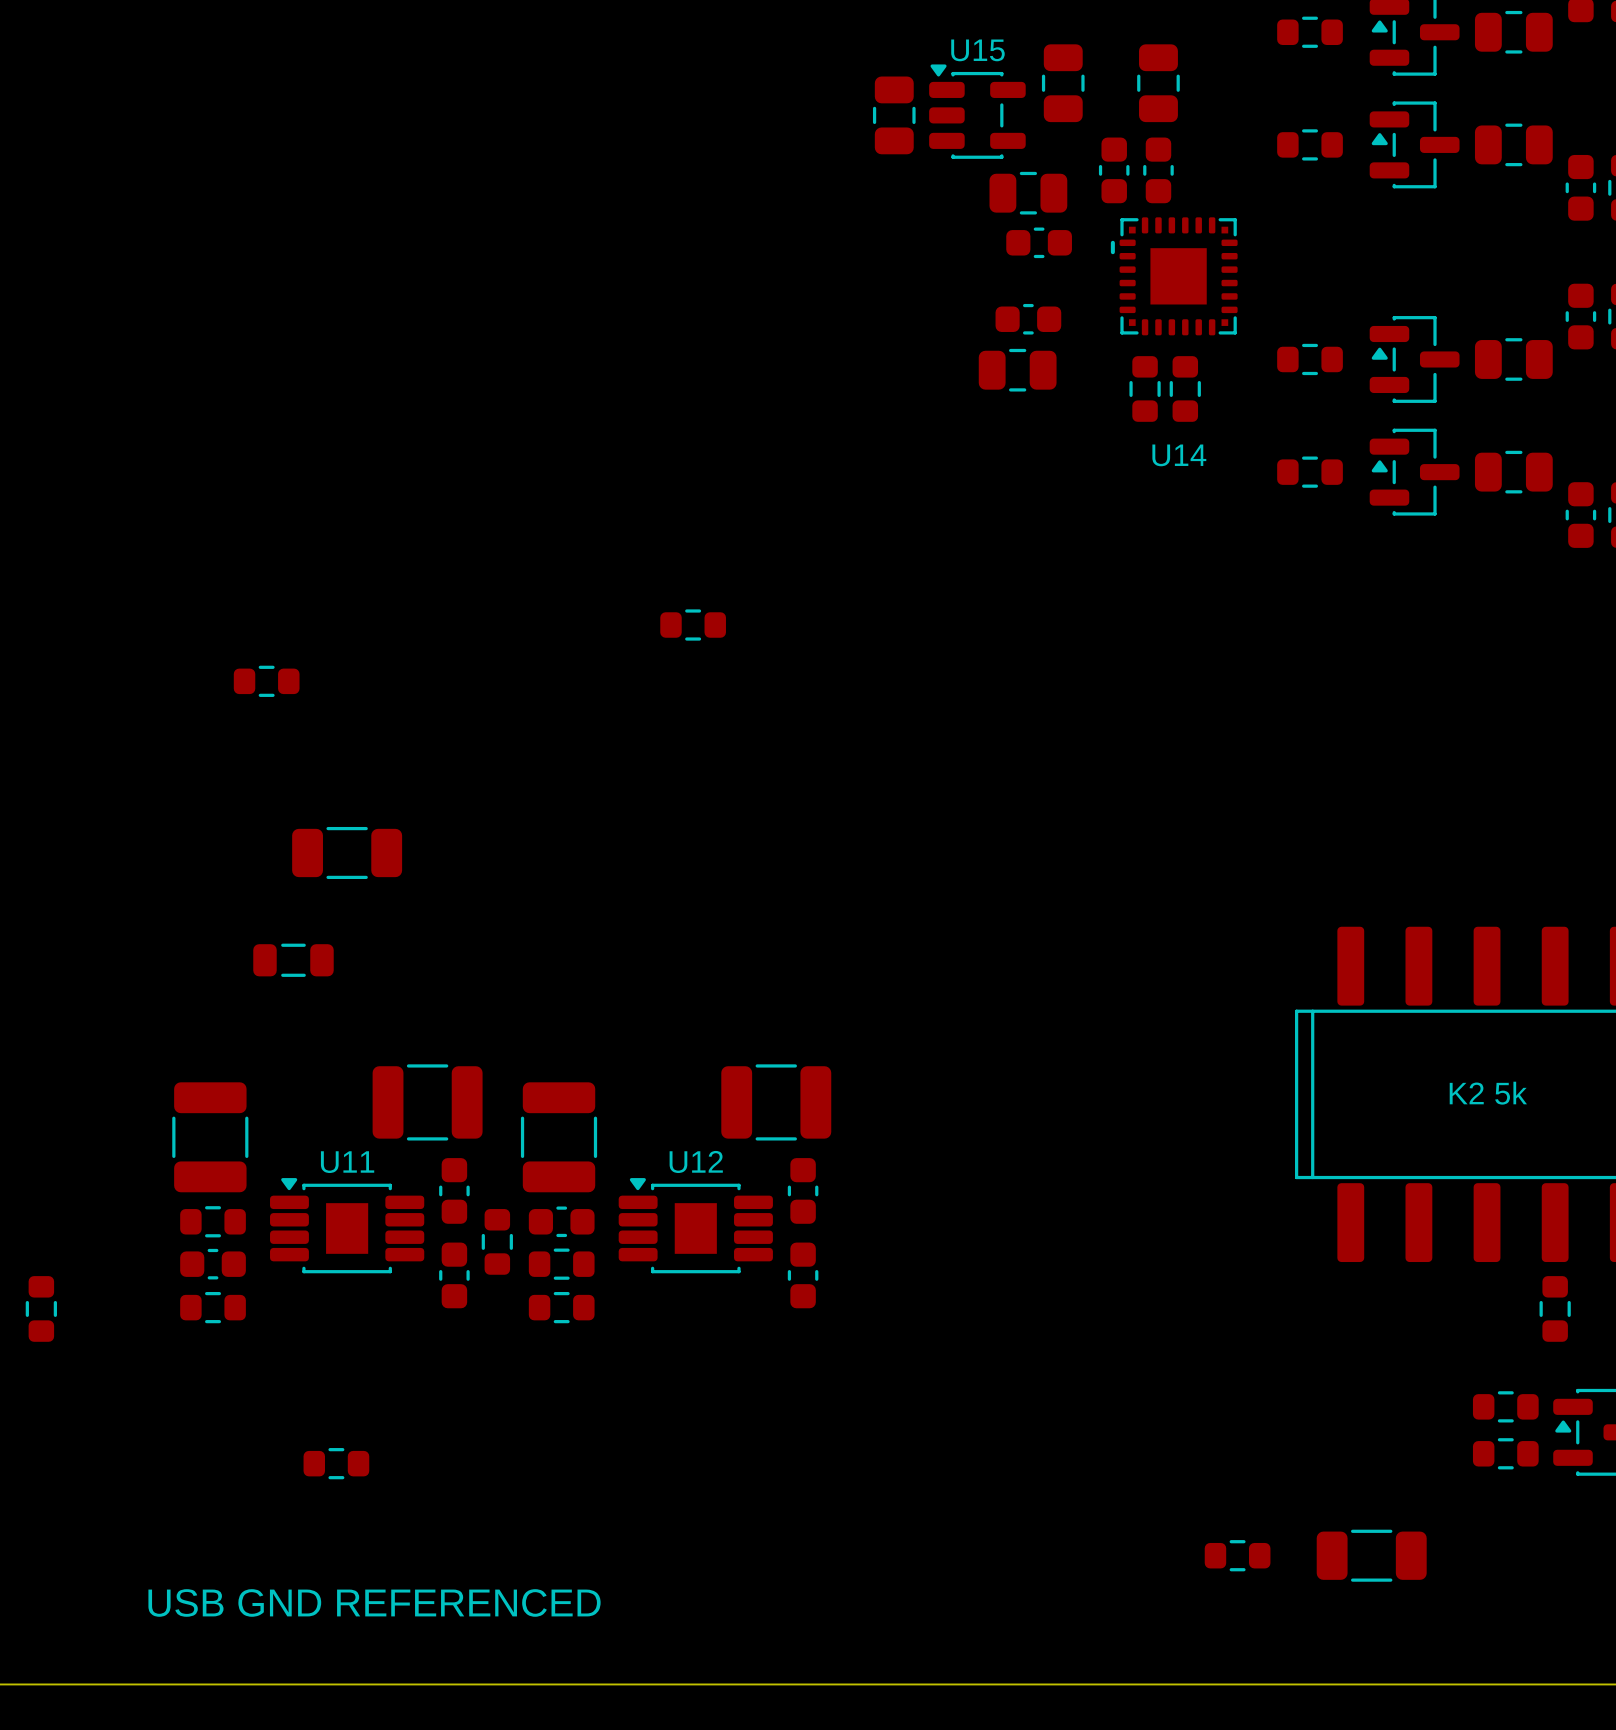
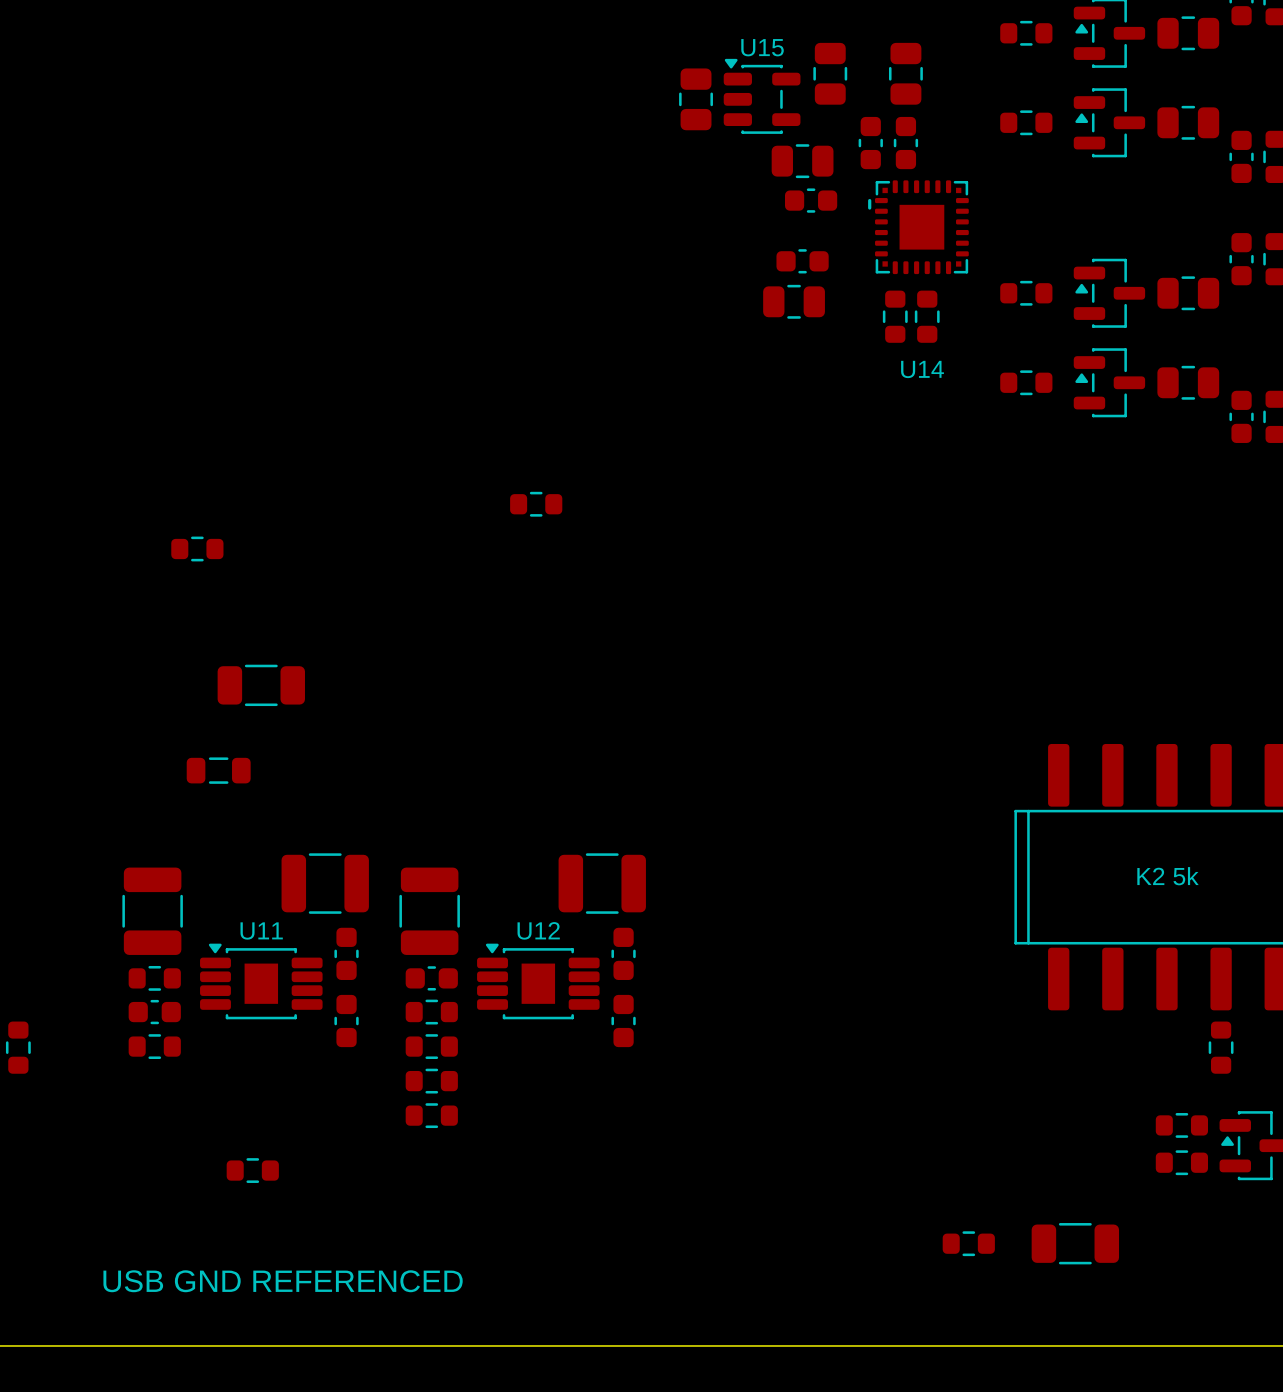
part: (497, 1241) -> none
part: none -> (431, 1081)
part: none -> (431, 1115)

